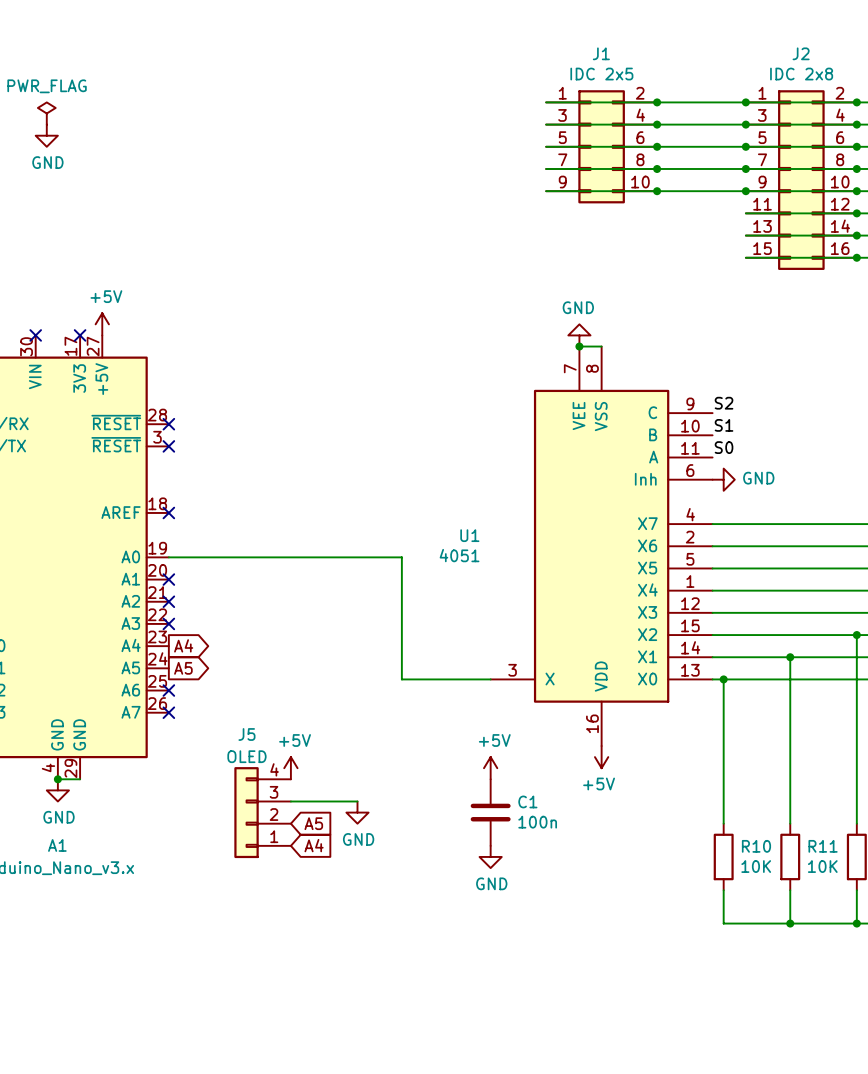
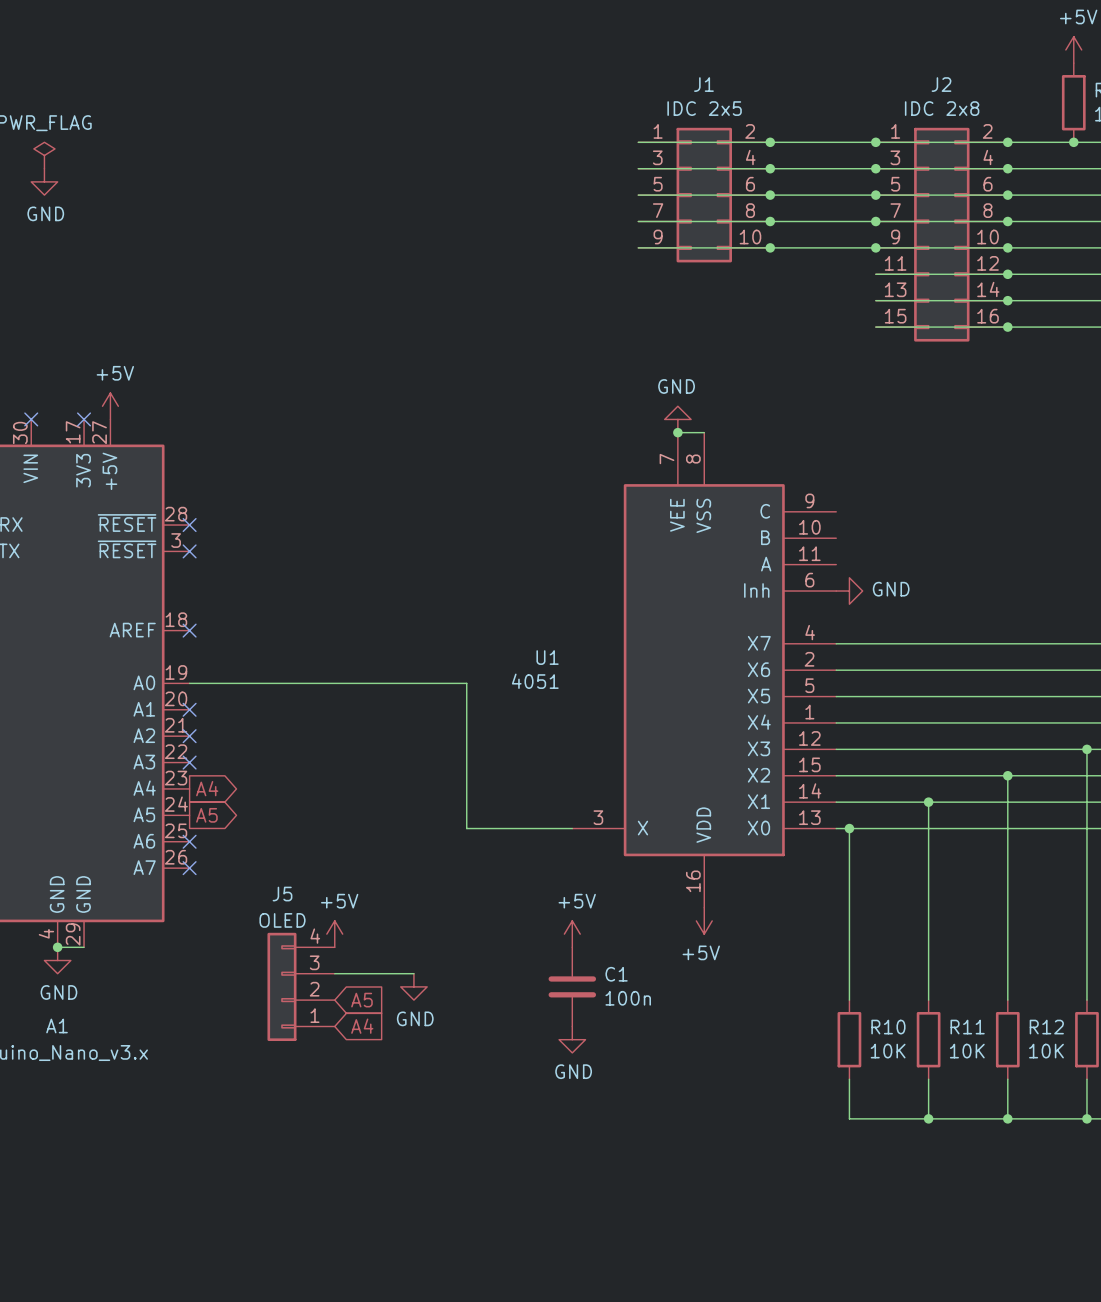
label: S2 (724, 403) -> none
label: S1 (724, 425) -> none
label: S0 (724, 447) -> none

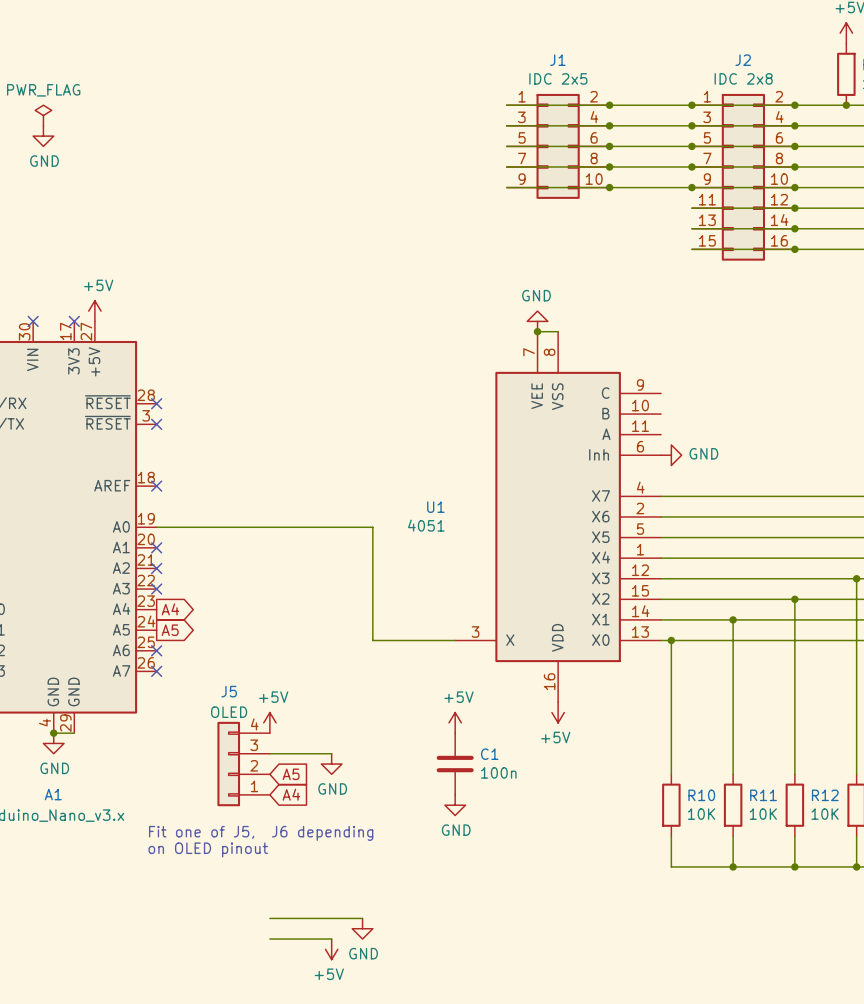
text: none -> Fit one of J5, J6 depending (261, 833)
text: none -> on OLED pinout (208, 849)
wire: none -> (269, 918) (362, 918)
power symbol: none -> GND (362, 928)
wire: none -> (269, 939) (331, 939)
power symbol: none -> +5V (331, 949)

